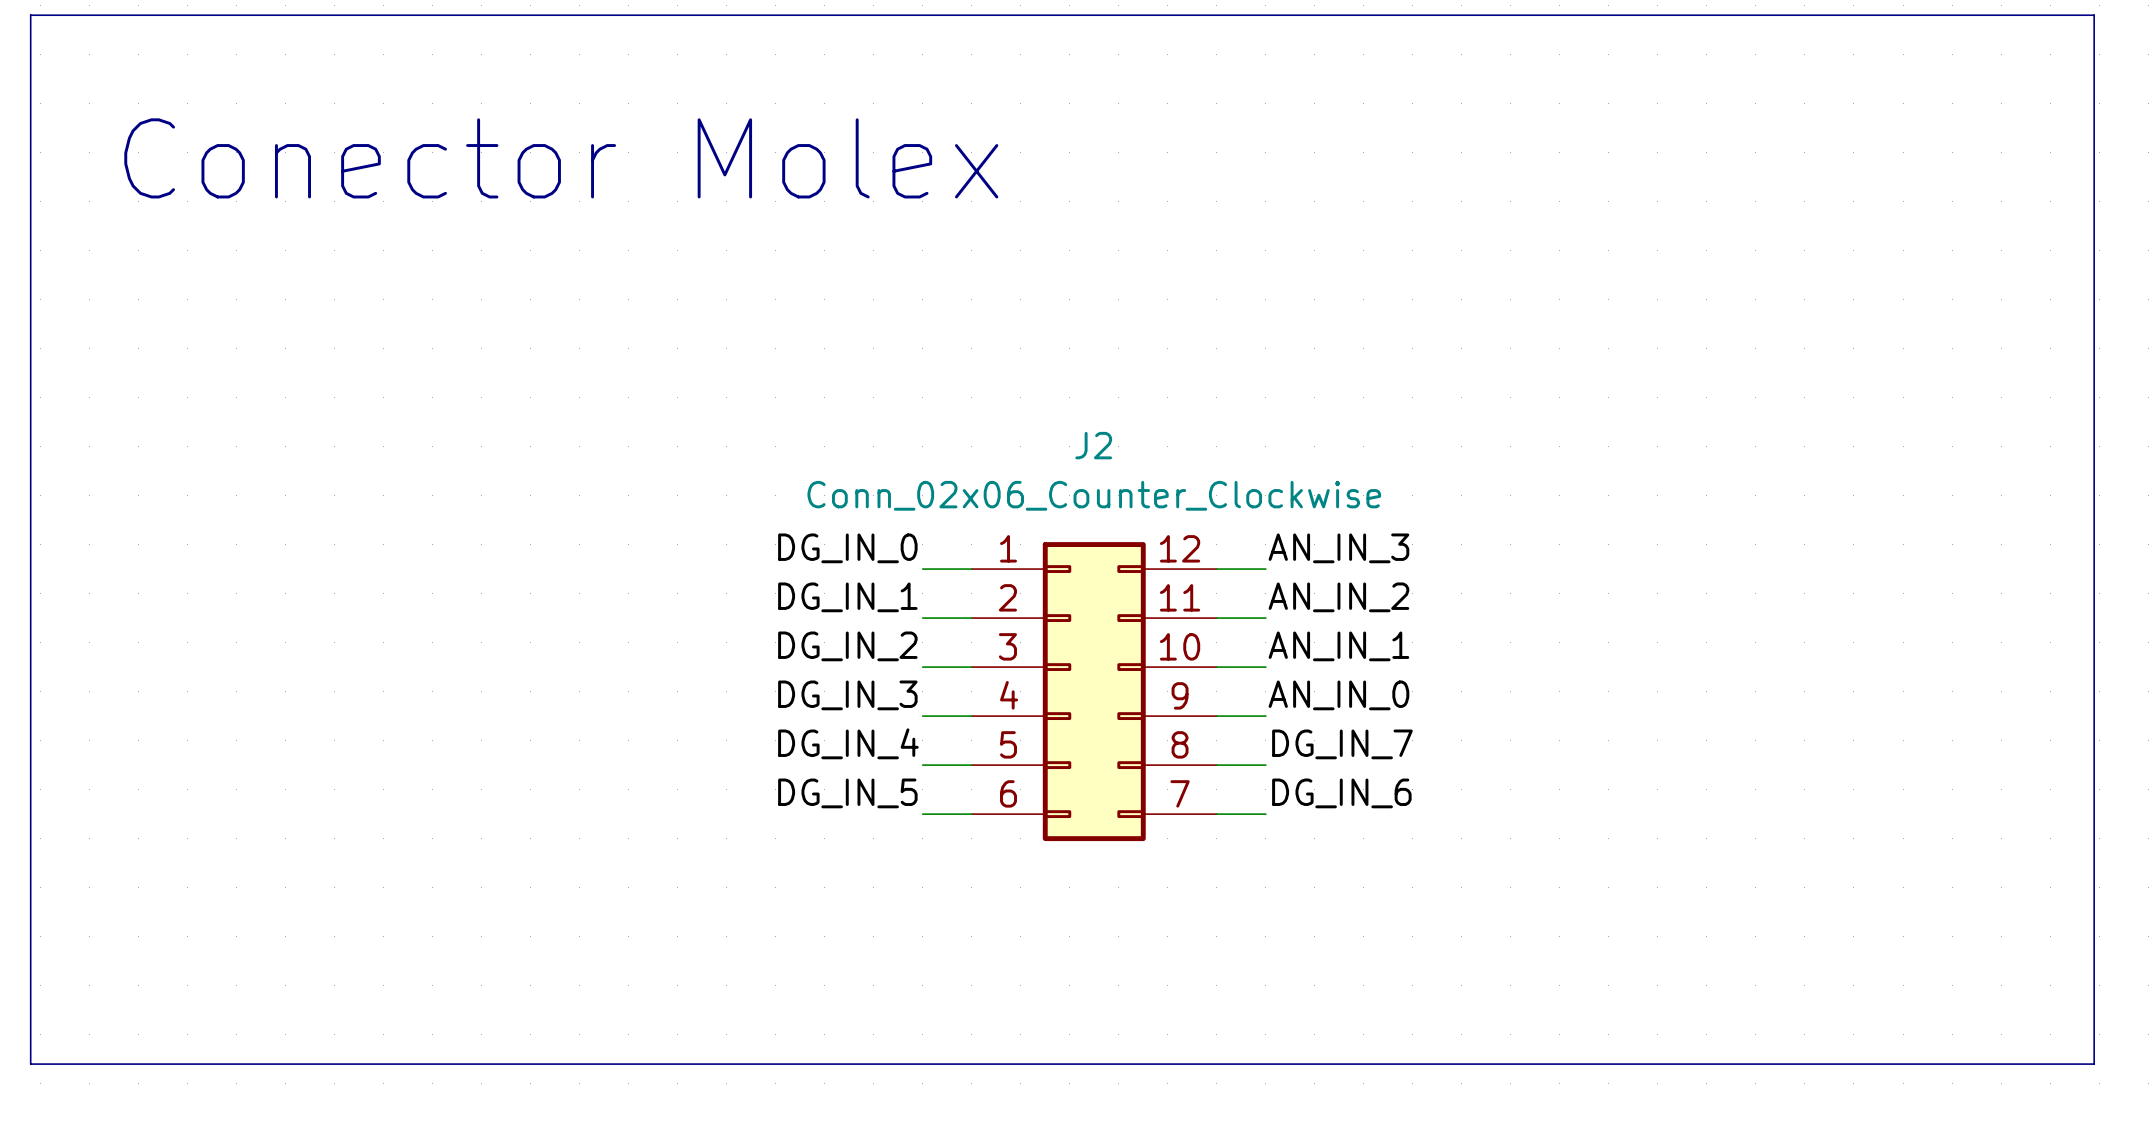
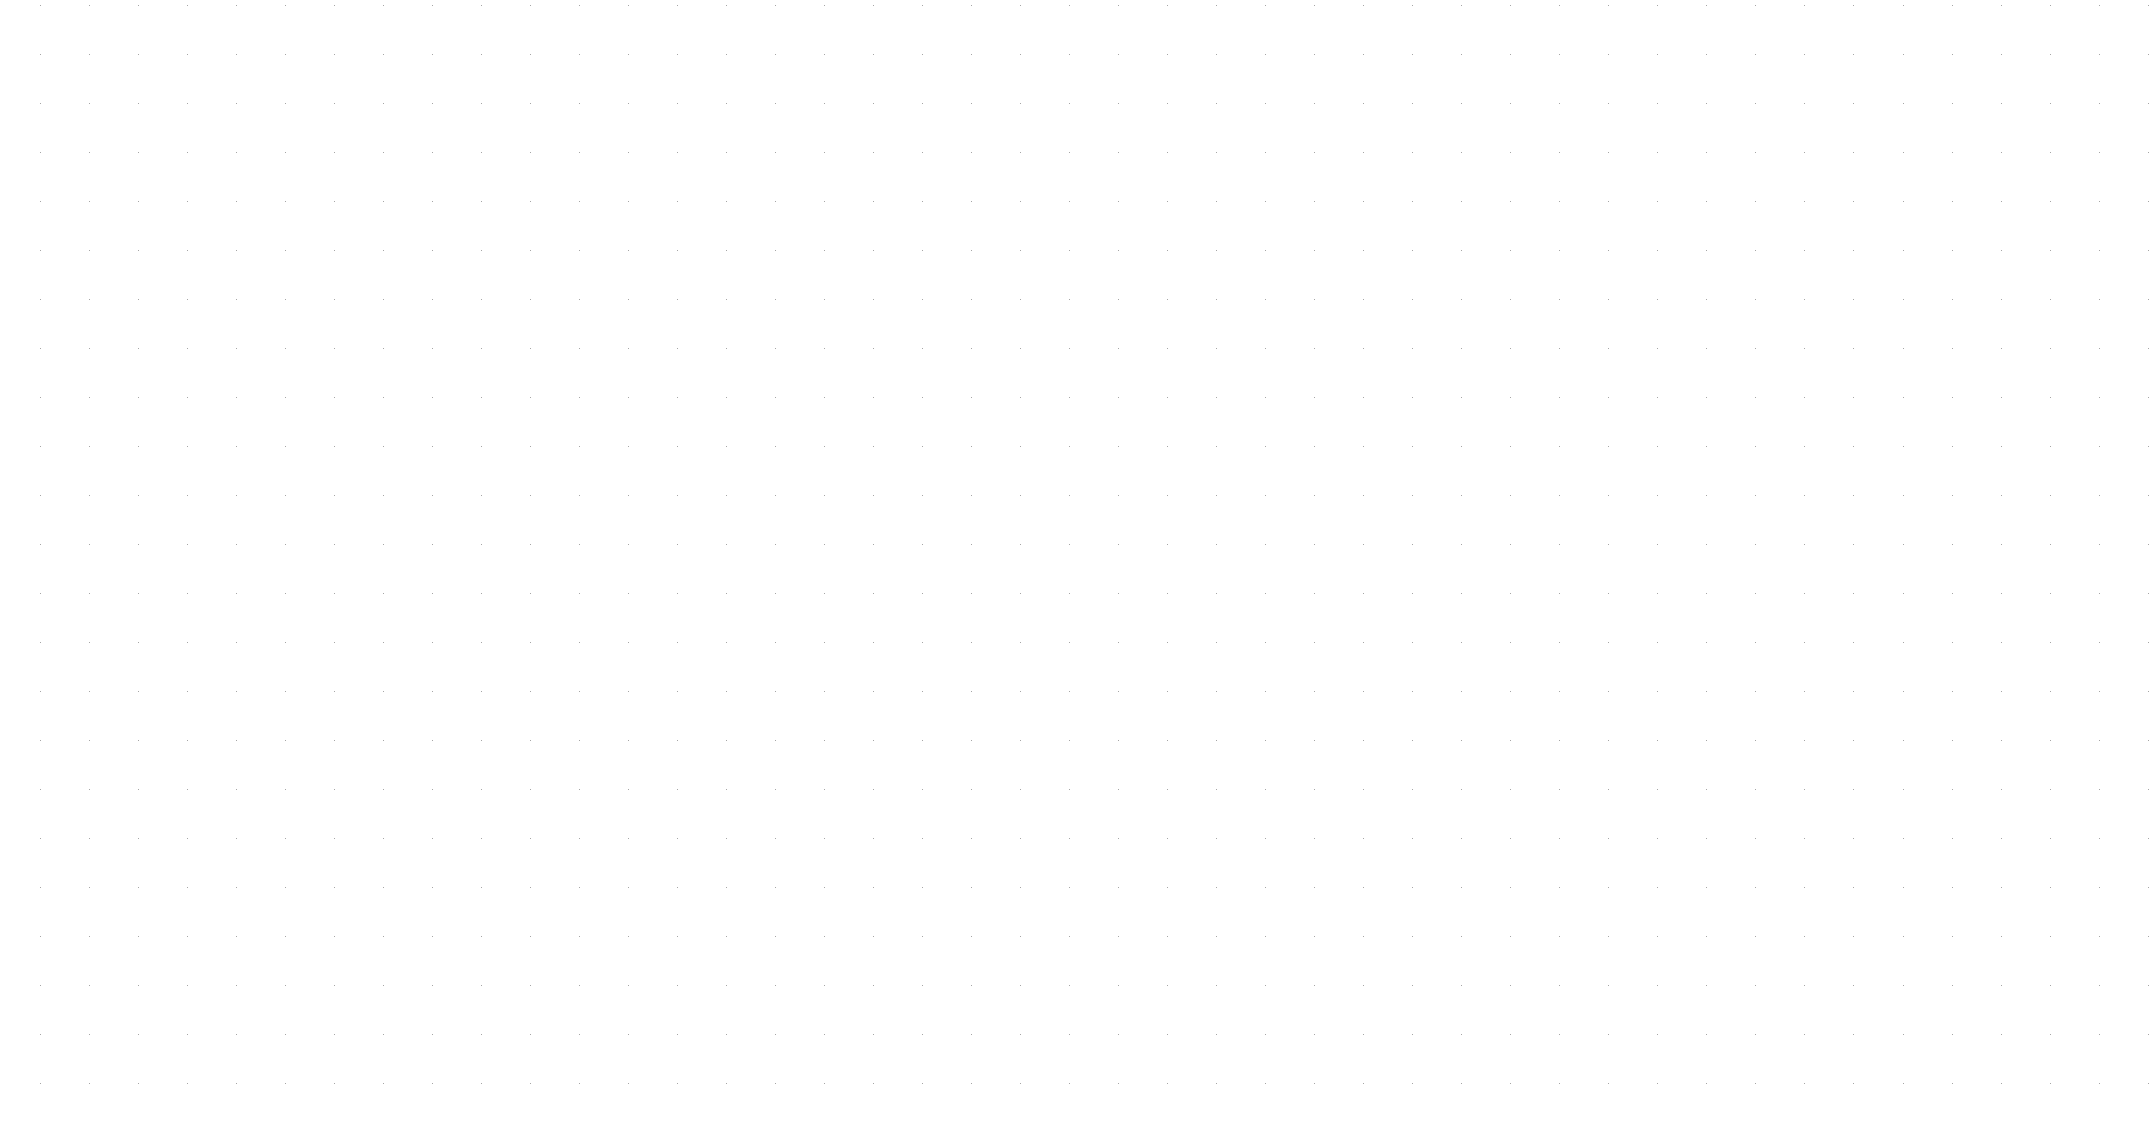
line: (30, 15) (2094, 15) (2094, 1064) (30, 1064) (30, 15) -> none
text: Conector Molex (561, 158) -> none
label: DG_IN_0 (847, 548) -> none
label: AN_IN_3 (1338, 548) -> none
wire: (922, 569) (971, 569) -> none
wire: (1216, 569) (1265, 569) -> none
label: DG_IN_1 (847, 597) -> none
label: AN_IN_2 (1338, 597) -> none
wire: (922, 618) (971, 618) -> none
wire: (1216, 618) (1265, 618) -> none
label: DG_IN_2 (847, 646) -> none
label: AN_IN_1 (1338, 646) -> none
wire: (922, 667) (971, 667) -> none
wire: (1216, 667) (1265, 667) -> none
J2: Conn_02x06_Counter_Clockwise (1094, 691) -> none
label: DG_IN_3 (847, 695) -> none
label: AN_IN_0 (1338, 695) -> none
wire: (922, 716) (971, 716) -> none
wire: (1216, 716) (1265, 716) -> none
label: DG_IN_4 (848, 743) -> none
label: DG_IN_7 (1342, 744) -> none
wire: (922, 765) (971, 765) -> none
wire: (1216, 765) (1265, 765) -> none
label: DG_IN_5 (847, 793) -> none
label: DG_IN_6 (1341, 793) -> none
wire: (922, 814) (971, 814) -> none
wire: (1216, 814) (1265, 814) -> none

